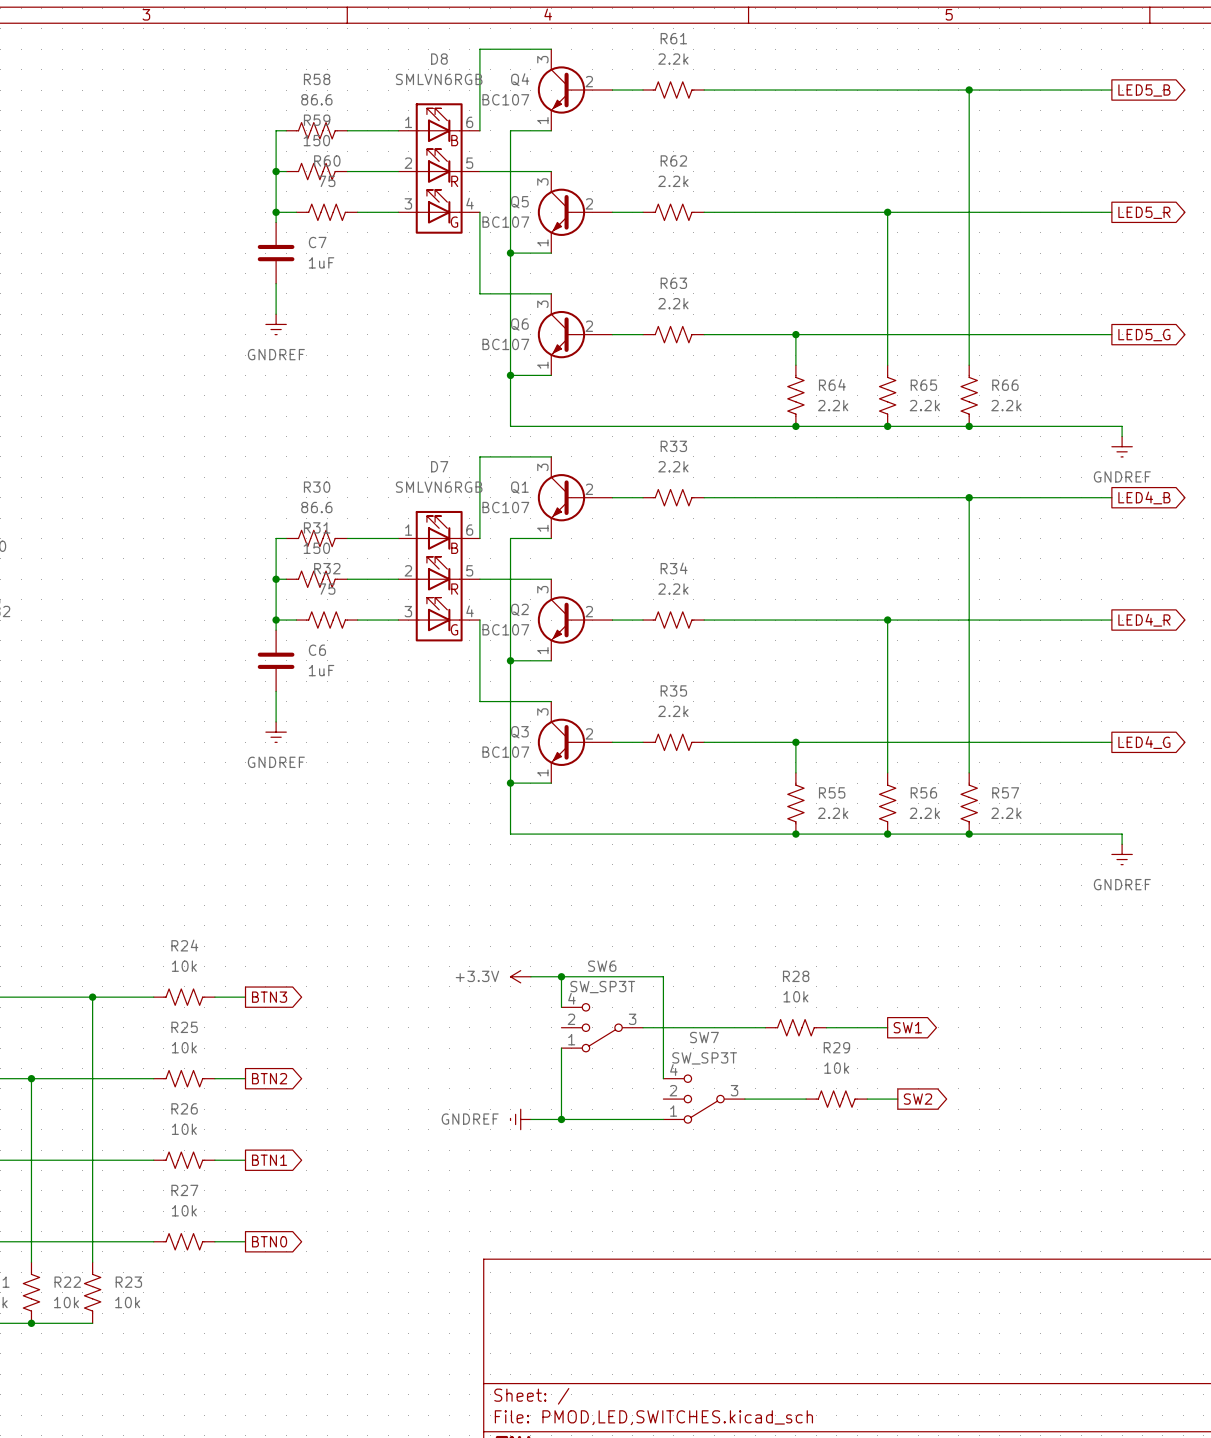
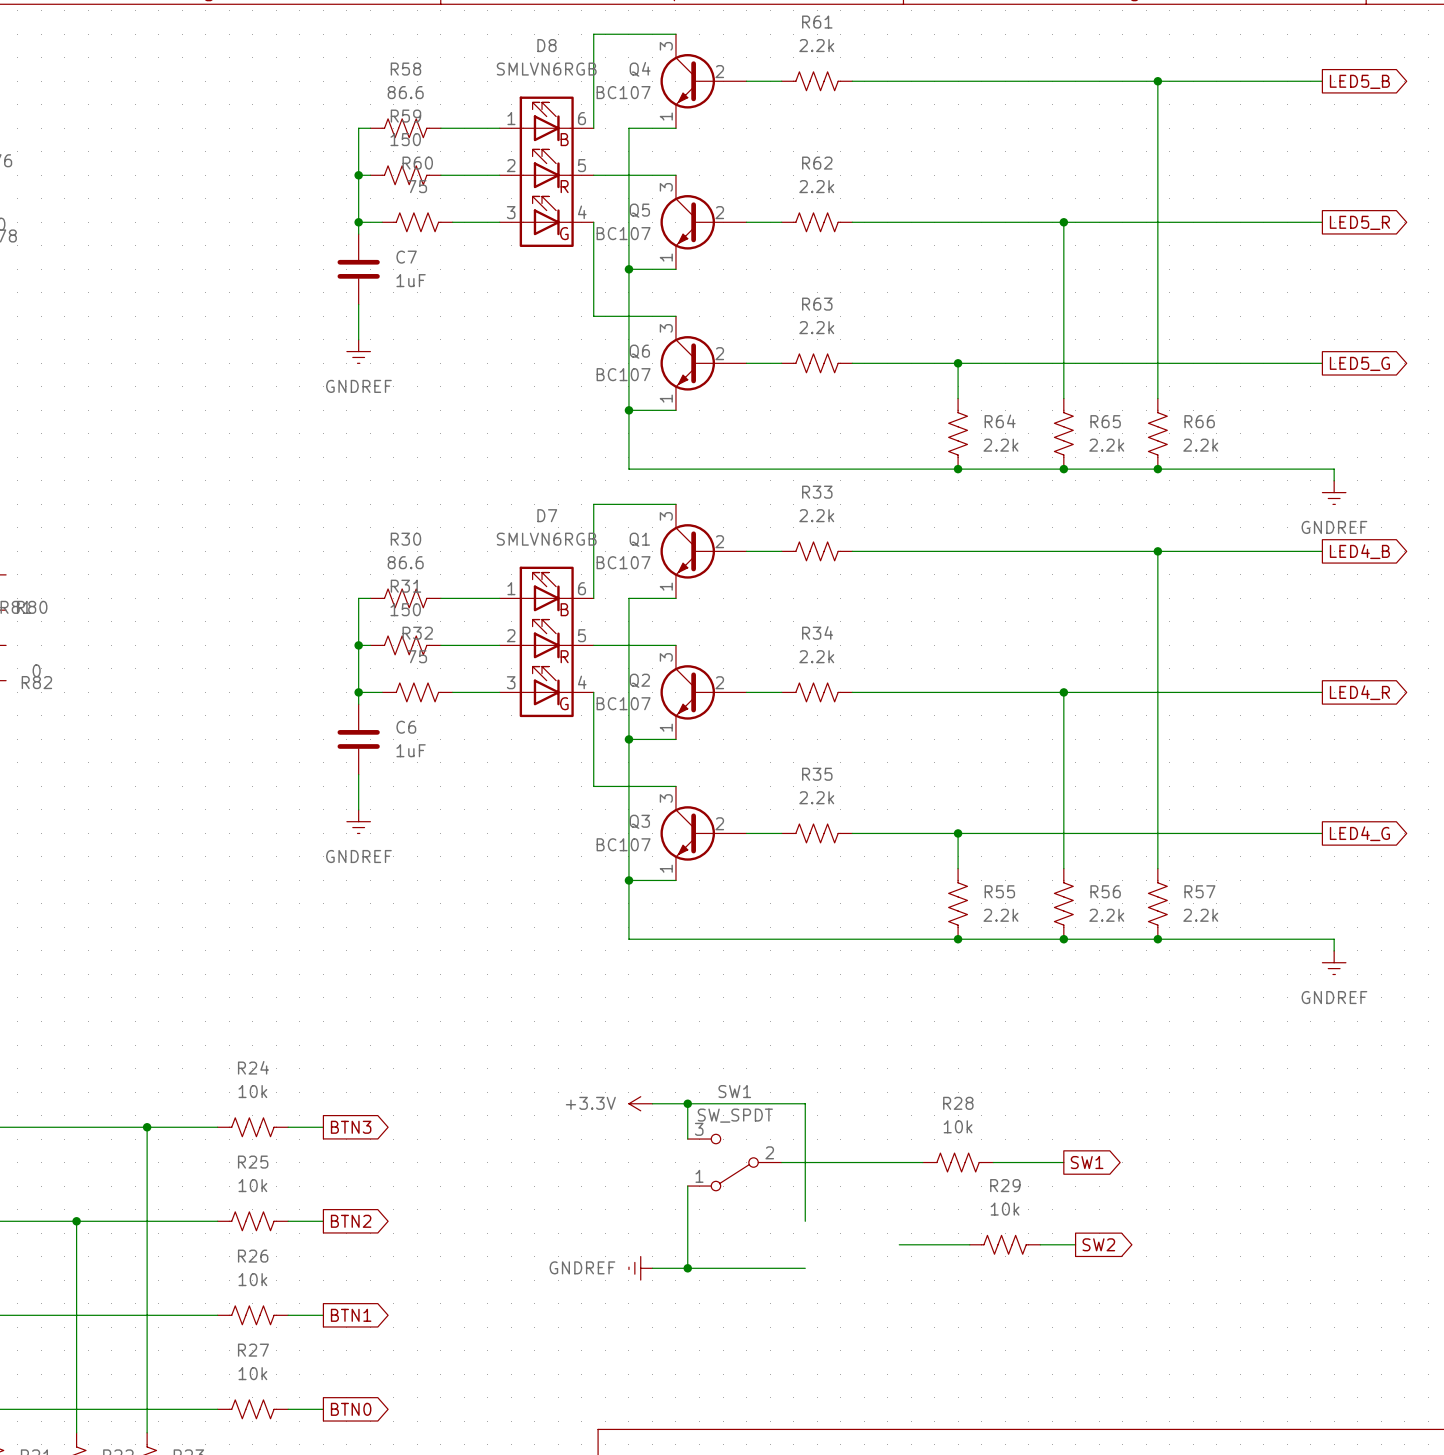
SW6: SW_SP3T (602, 1027) -> none
SW1: none -> SW_SPDT (734, 1162)
SW7: SW_SP3T (704, 1099) -> none

